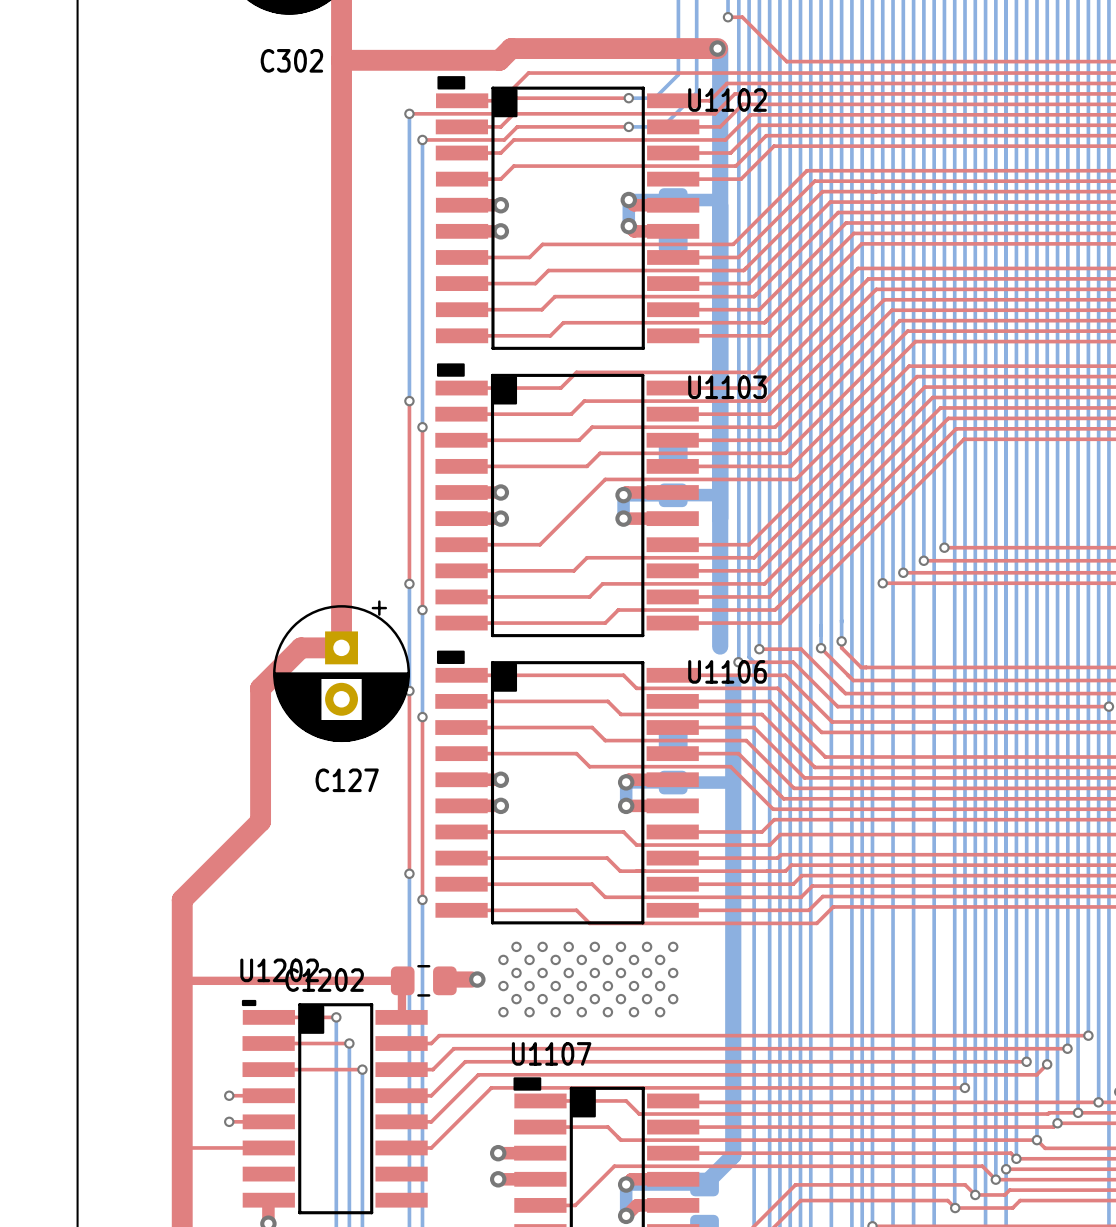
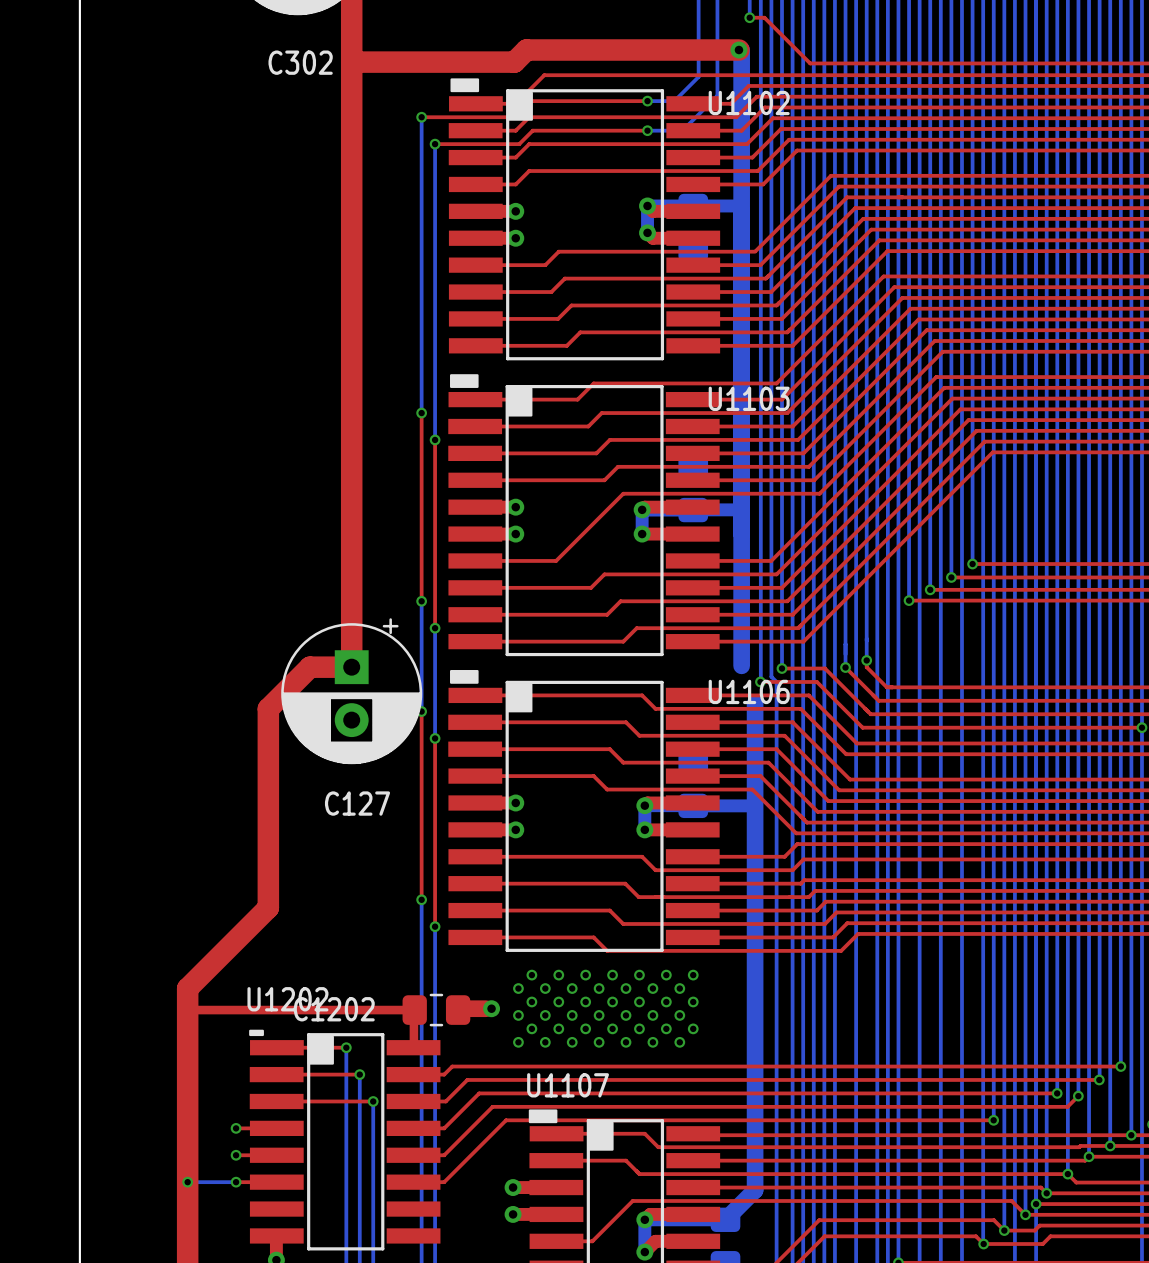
top track: (260, 821) (182, 899) (182, 959) -> (268, 846) (268, 907) (187, 988)
top track: (182, 1147) (229, 1147) -> none
bottom track: none -> (187, 1182) (236, 1182)
via: none -> (187, 1182)
via: none -> (236, 1182)

